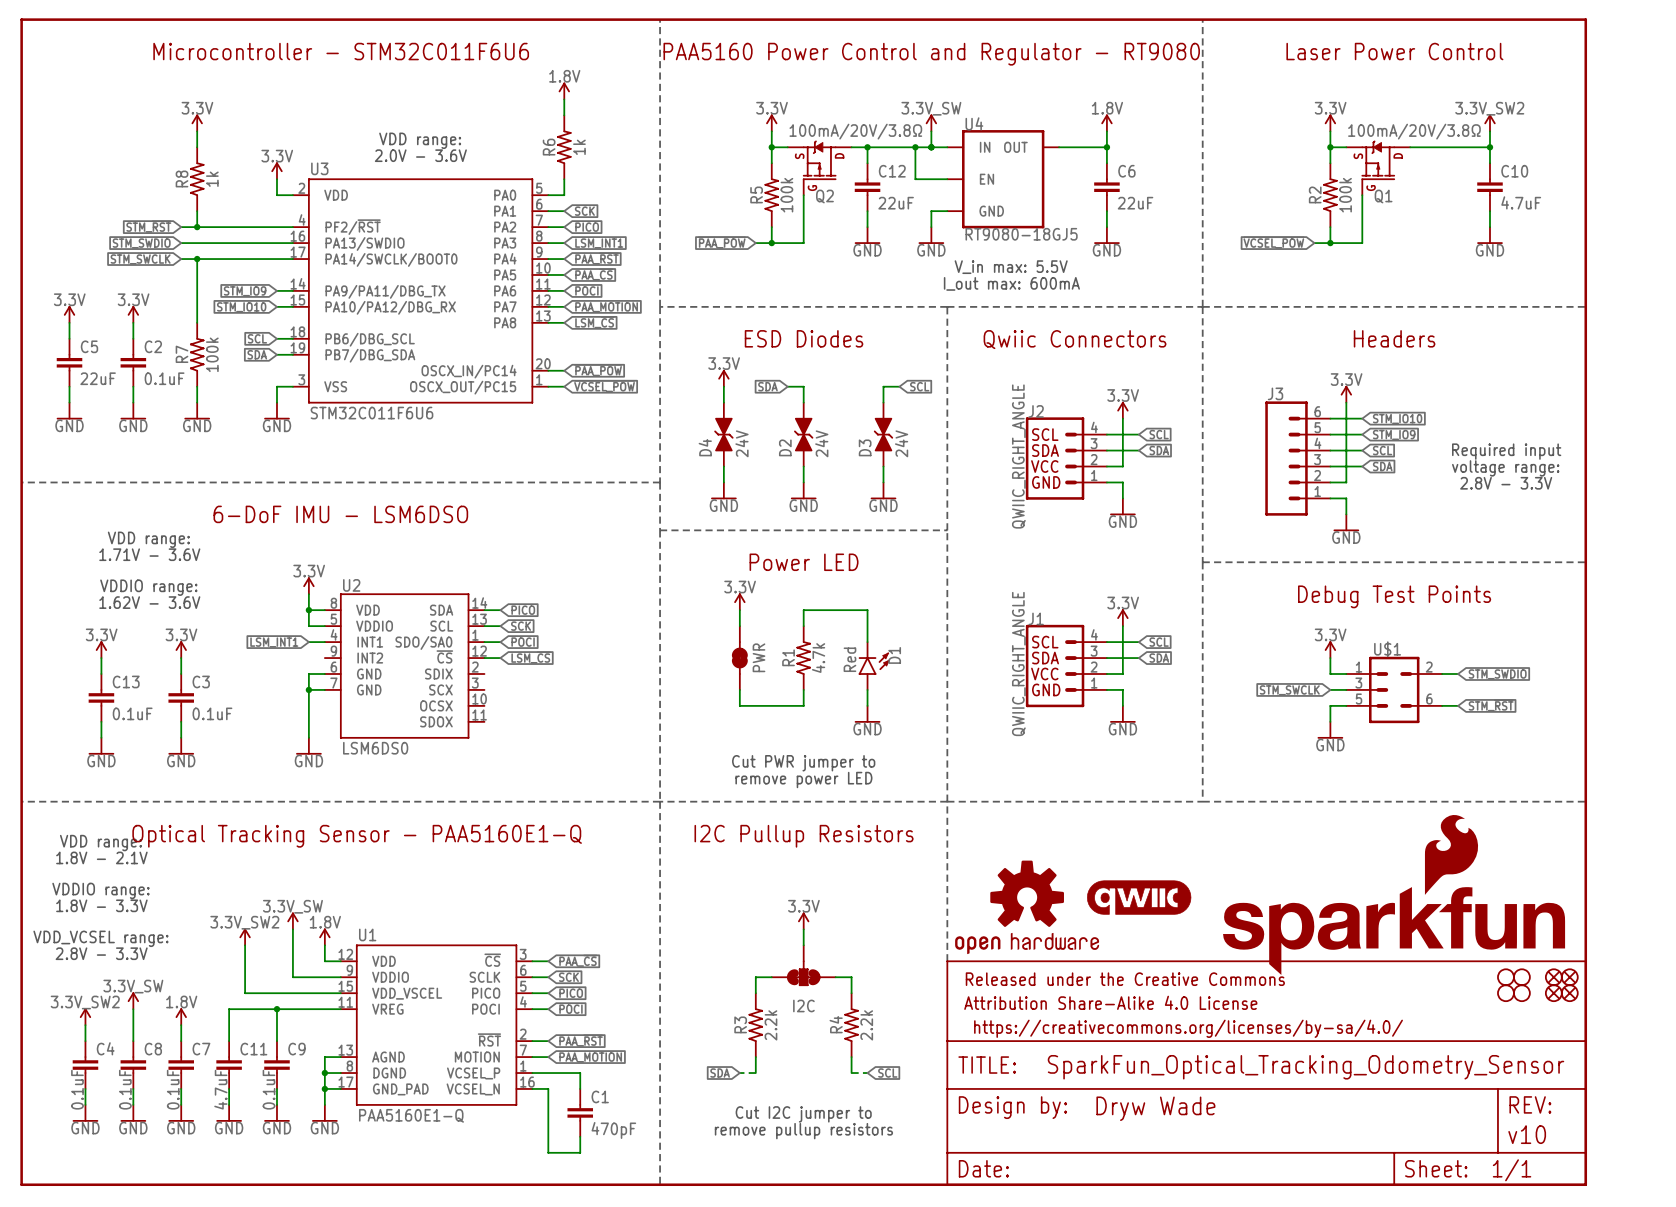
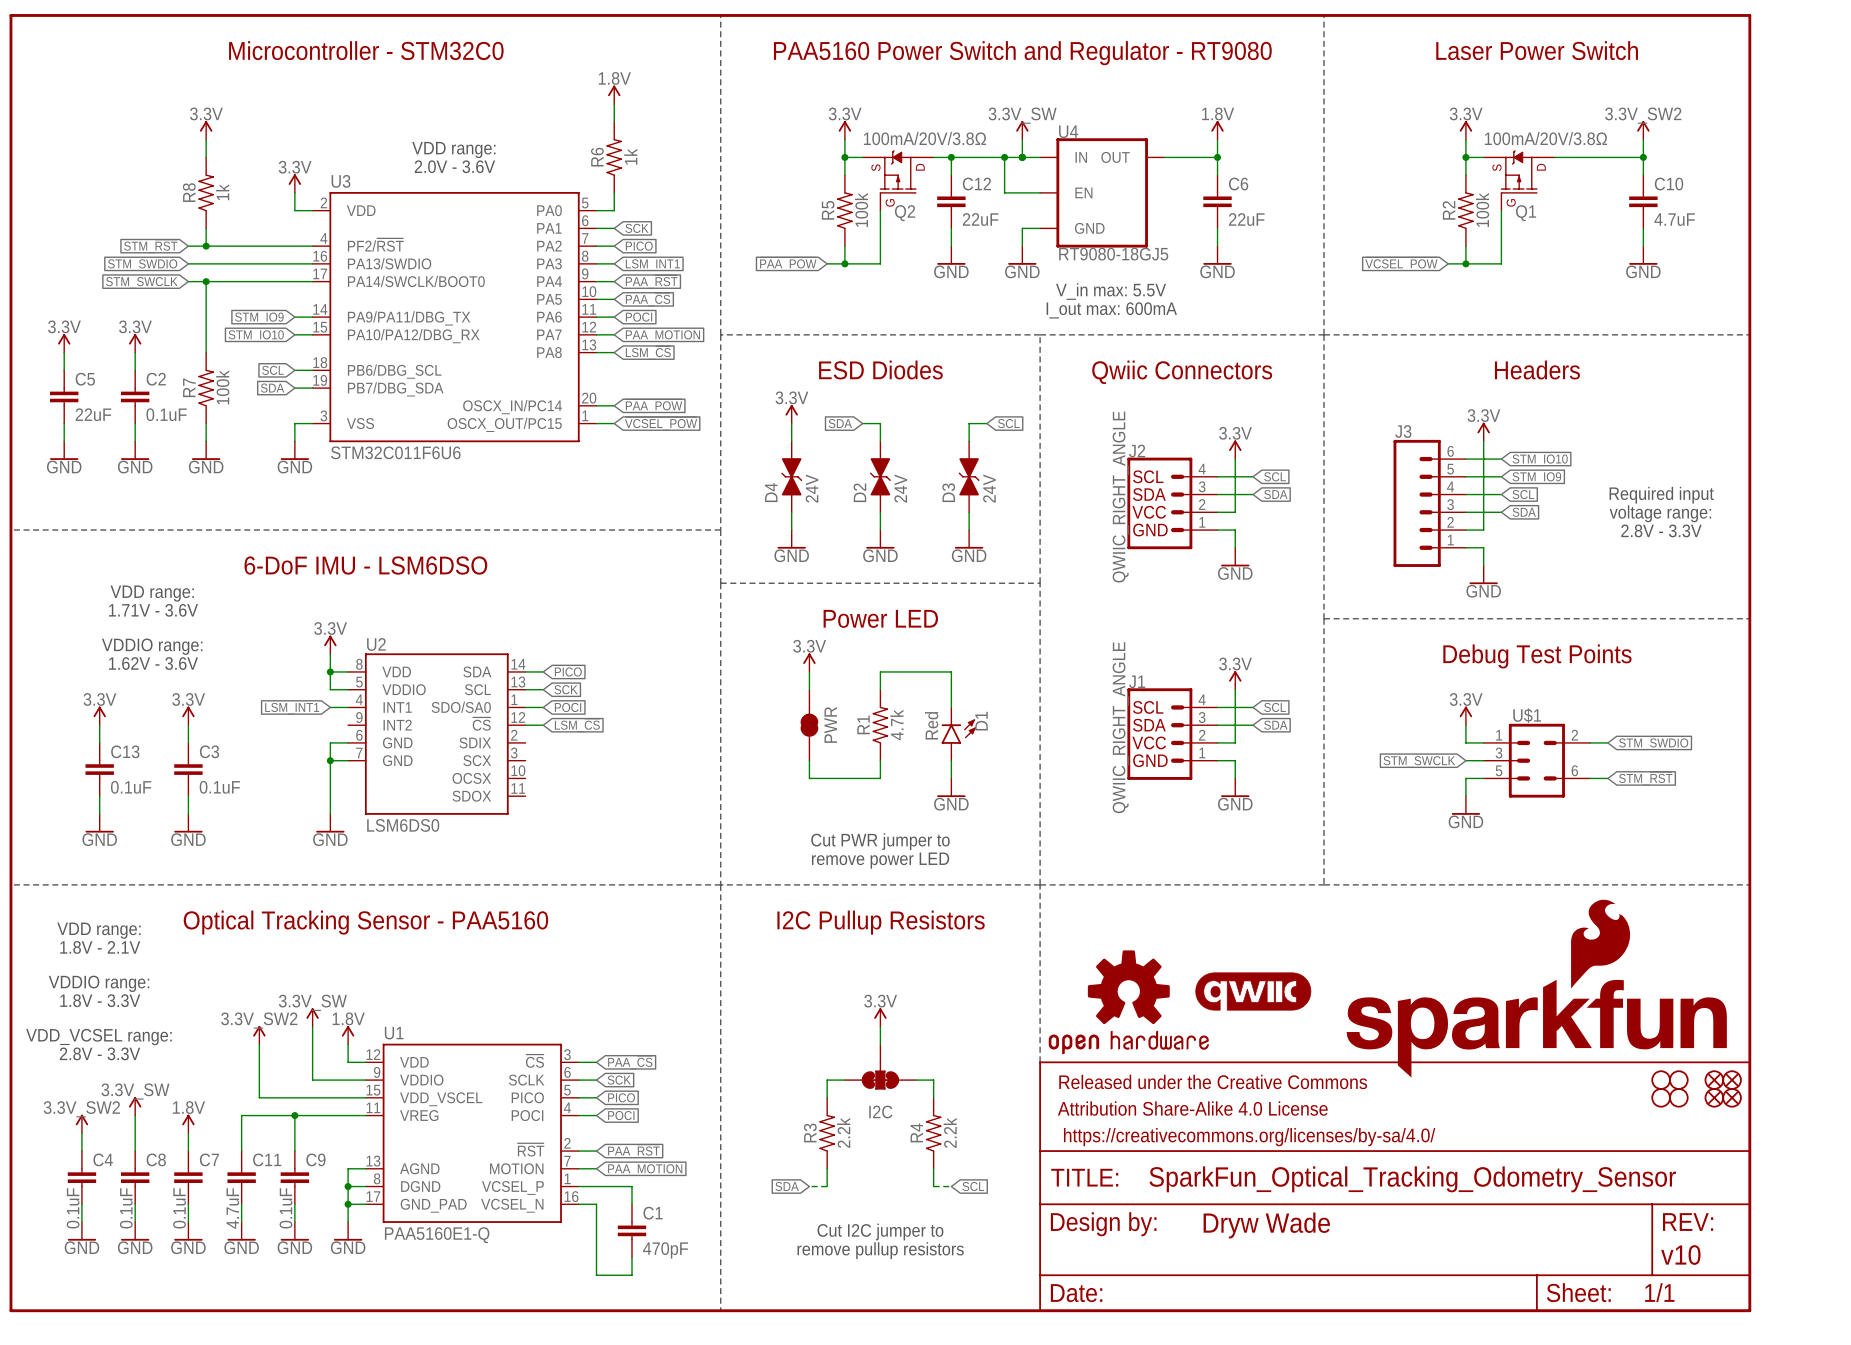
text: Microcontroller - STM32C011F6U6 (341, 51) -> Microcontroller - STM32C0 (366, 50)
text: Laser Power Control (1394, 51) -> Laser Power Switch (1537, 50)
text: PAA5160 Power Control and Regulator - RT9080 (931, 54) -> PAA5160 Power Switch and Regulator - RT9080 (1022, 53)
text: Optical Tracking Sensor - PAA5160E1-Q (357, 836) -> Optical Tracking Sensor - PAA5160 (365, 922)

